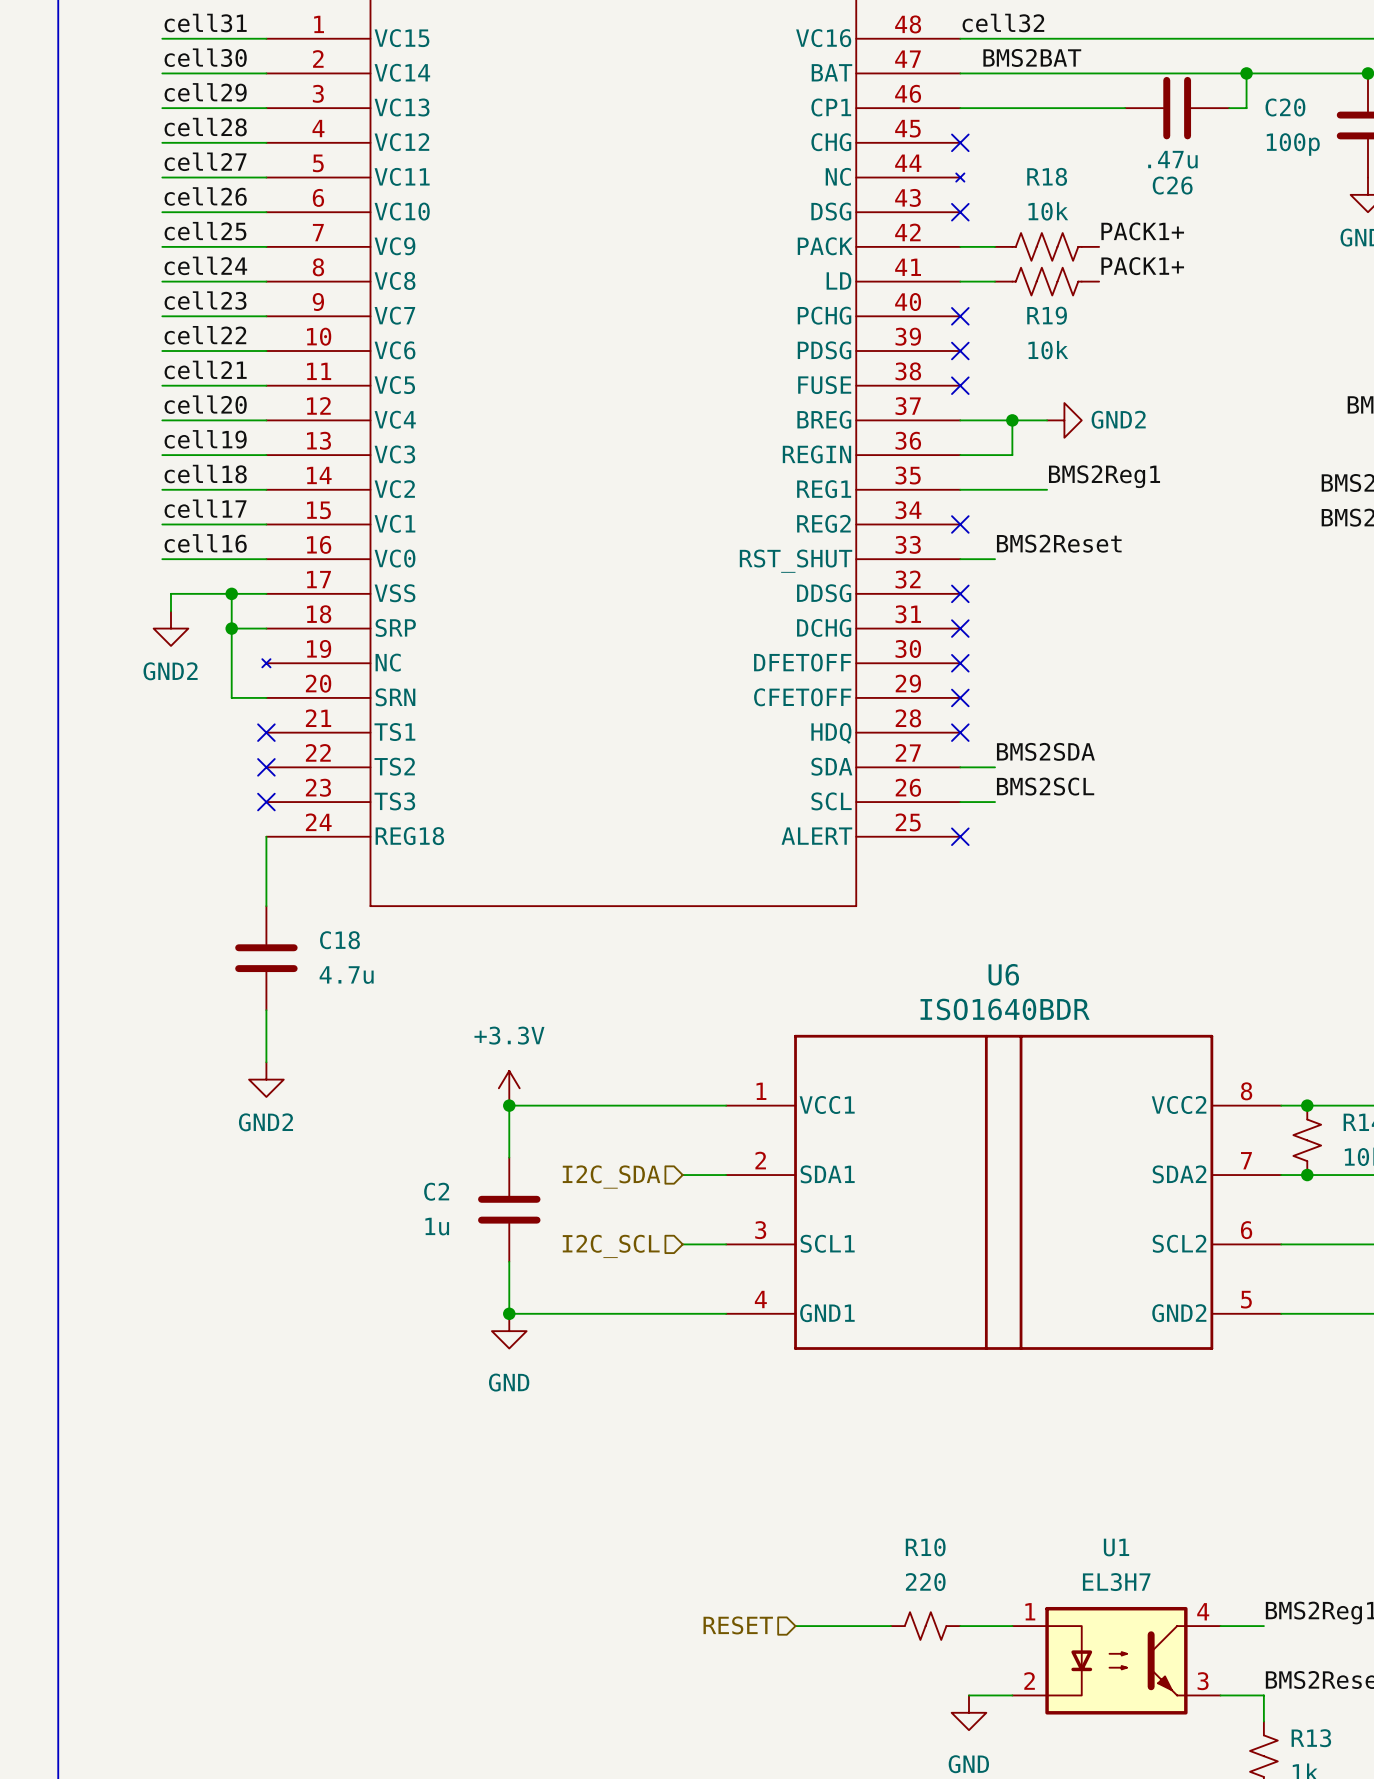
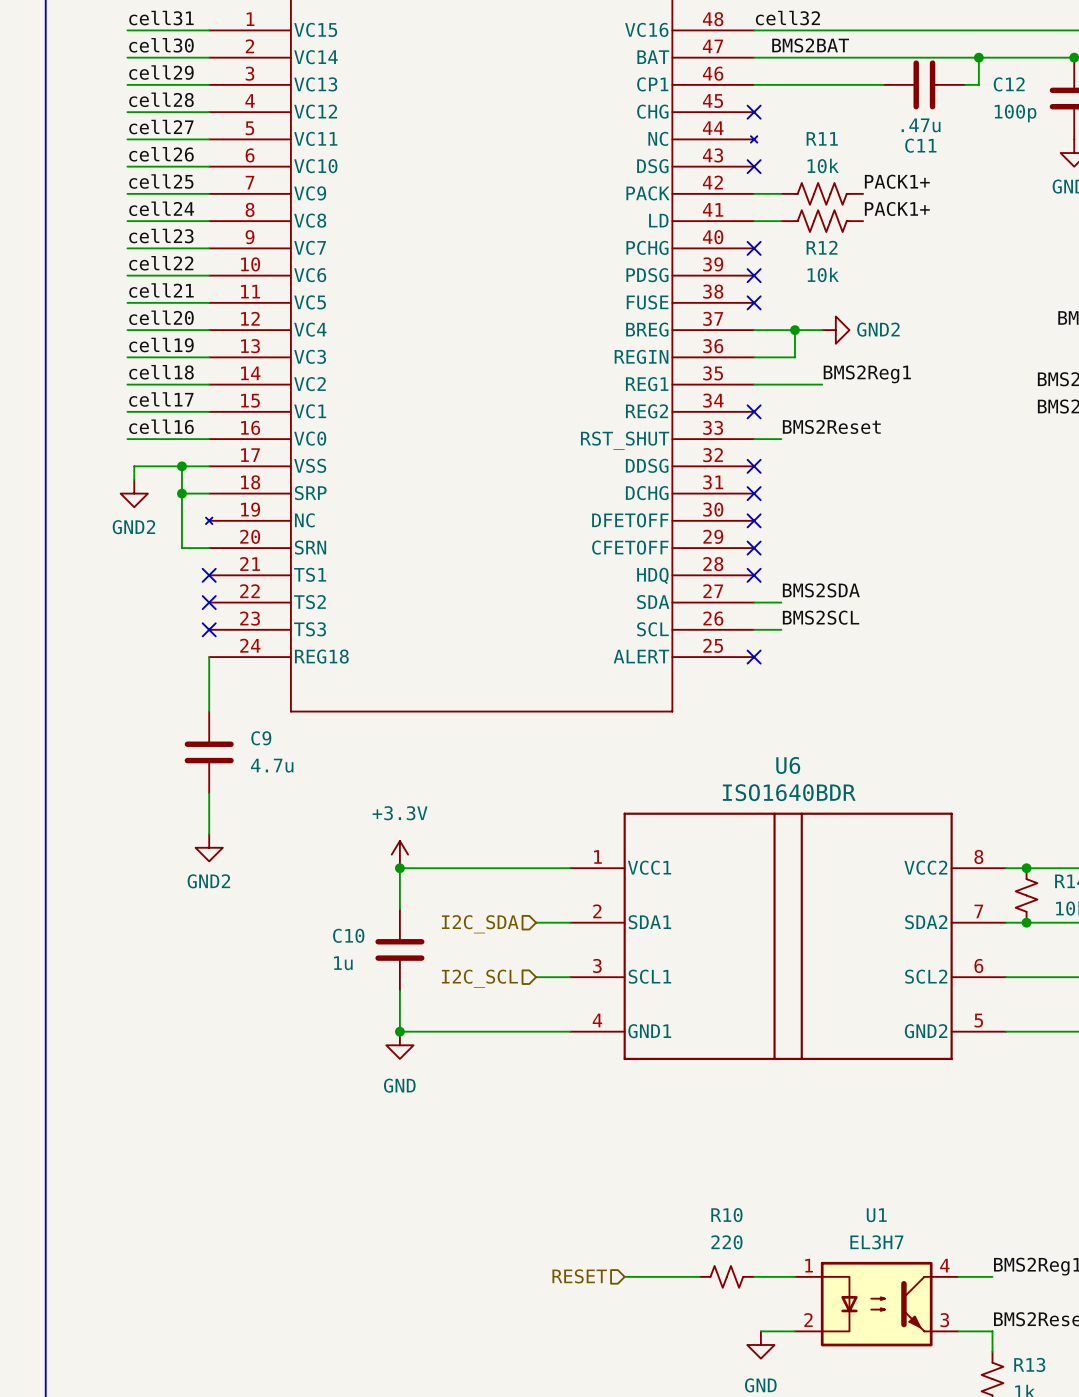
C20 name: C20 (1285, 107) -> C12 (1009, 84)
R18 name: R18 (1047, 176) -> R11 (822, 138)
C26 name: C26 (1172, 185) -> C11 (920, 145)
R19 name: R19 (1047, 315) -> R12 (822, 247)
C18 name: C18 (339, 940) -> C9 (261, 738)
C2 name: C2 (436, 1191) -> C10 (348, 935)

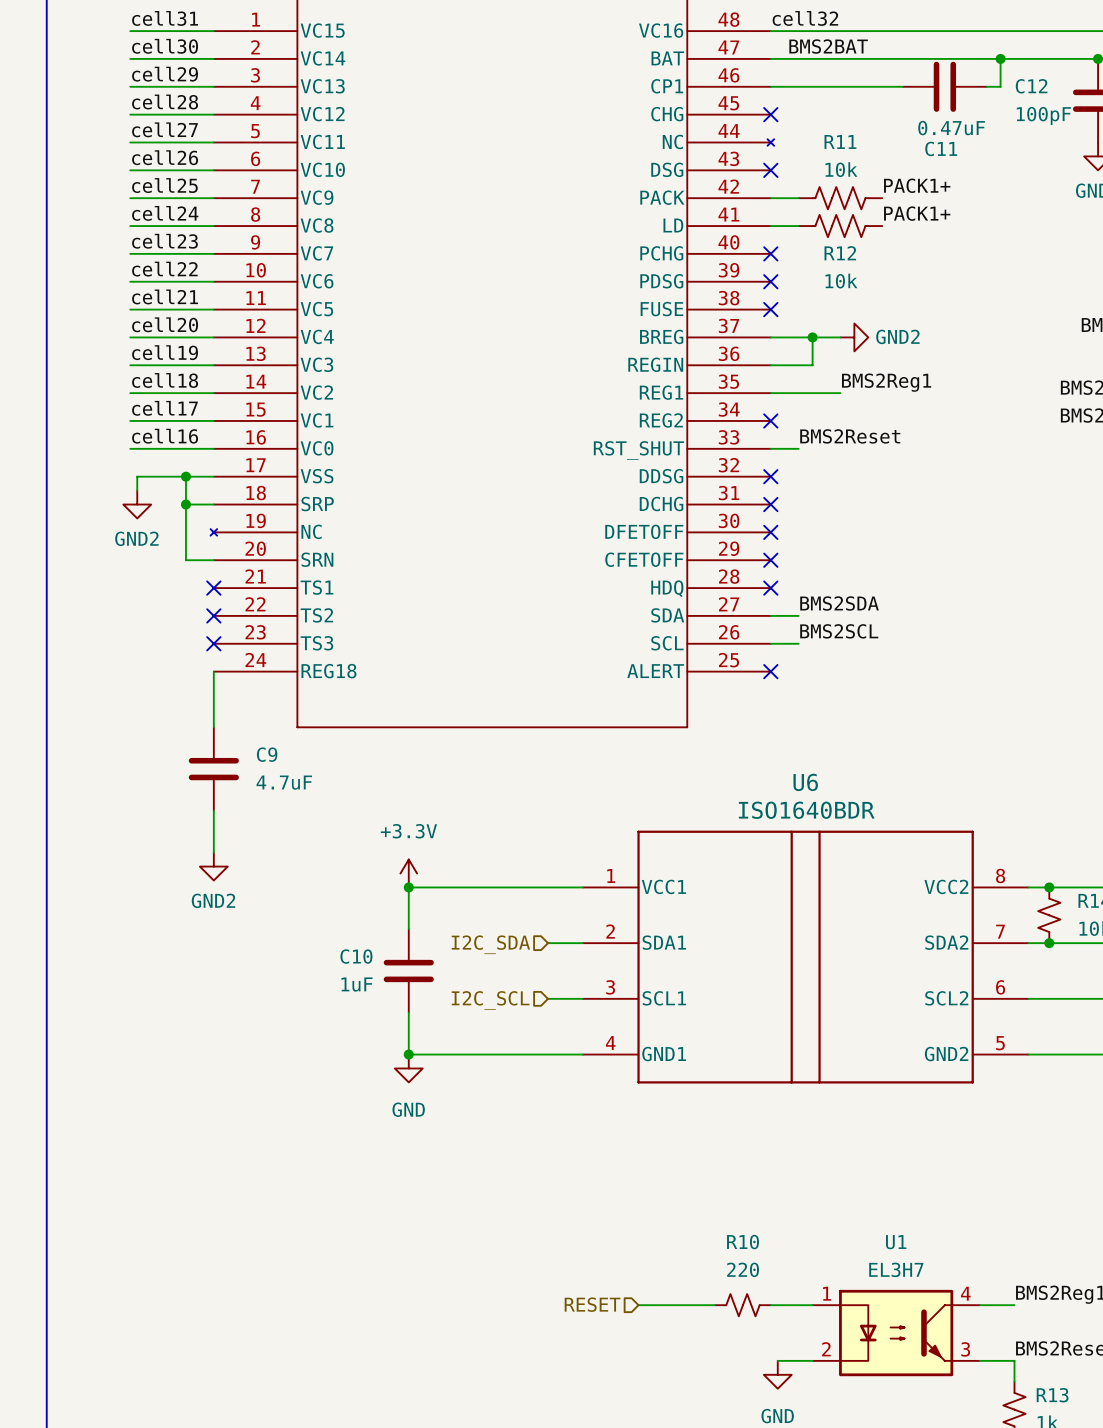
C12 value: 100p (1015, 113) -> 100pF (1043, 115)
C11 value: .47u (921, 125) -> 0.47uF (951, 128)
C9 value: 4.7u (272, 765) -> 4.7uF (284, 782)
C10 value: 1u (343, 963) -> 1uF (356, 984)

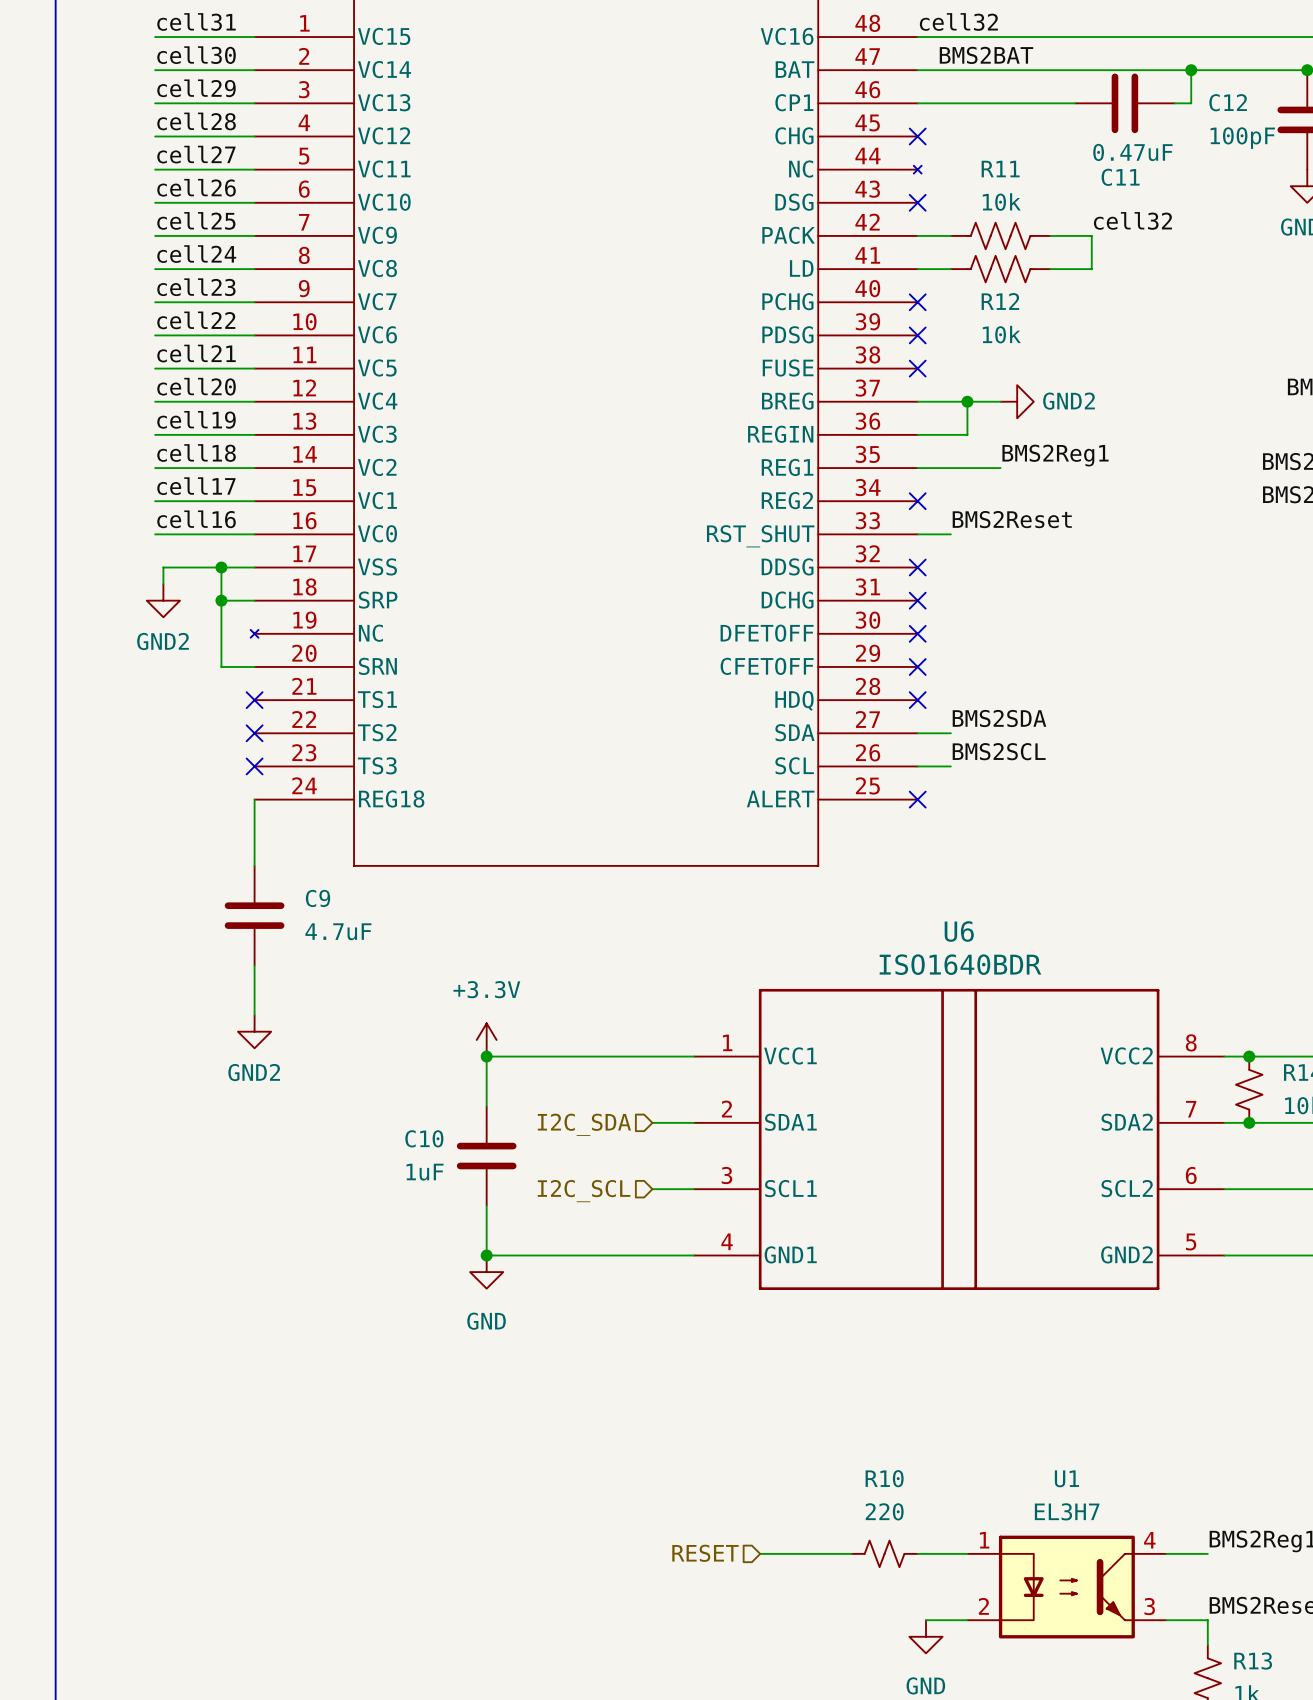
label: PACK1+ (917, 185) -> none
label: none -> cell32 (1132, 220)
wire: none -> (1050, 235) (1091, 235) (1091, 269) (1050, 269)
label: PACK1+ (917, 213) -> none

